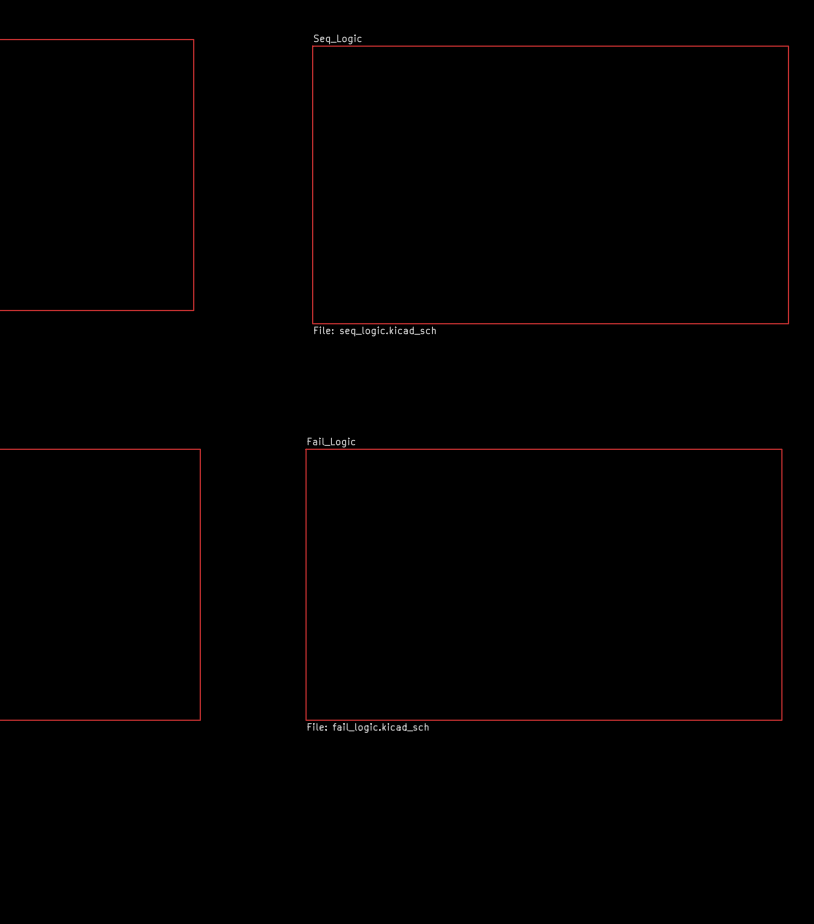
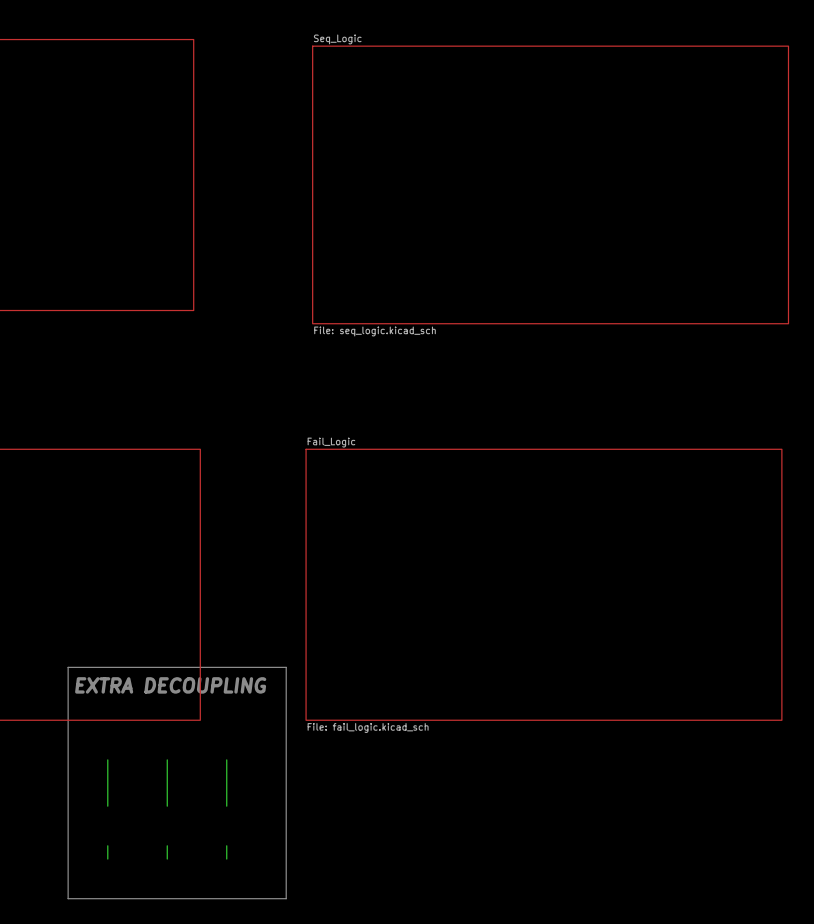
line: none -> (68, 667) (286, 667) (286, 898) (68, 898) (68, 667)
text: none -> EXTRA DECOUPLING (170, 685)
wire: none -> (107, 759) (107, 806)
wire: none -> (167, 759) (167, 806)
wire: none -> (226, 759) (226, 806)
wire: none -> (107, 845) (107, 859)
wire: none -> (167, 845) (167, 859)
wire: none -> (226, 845) (226, 859)

